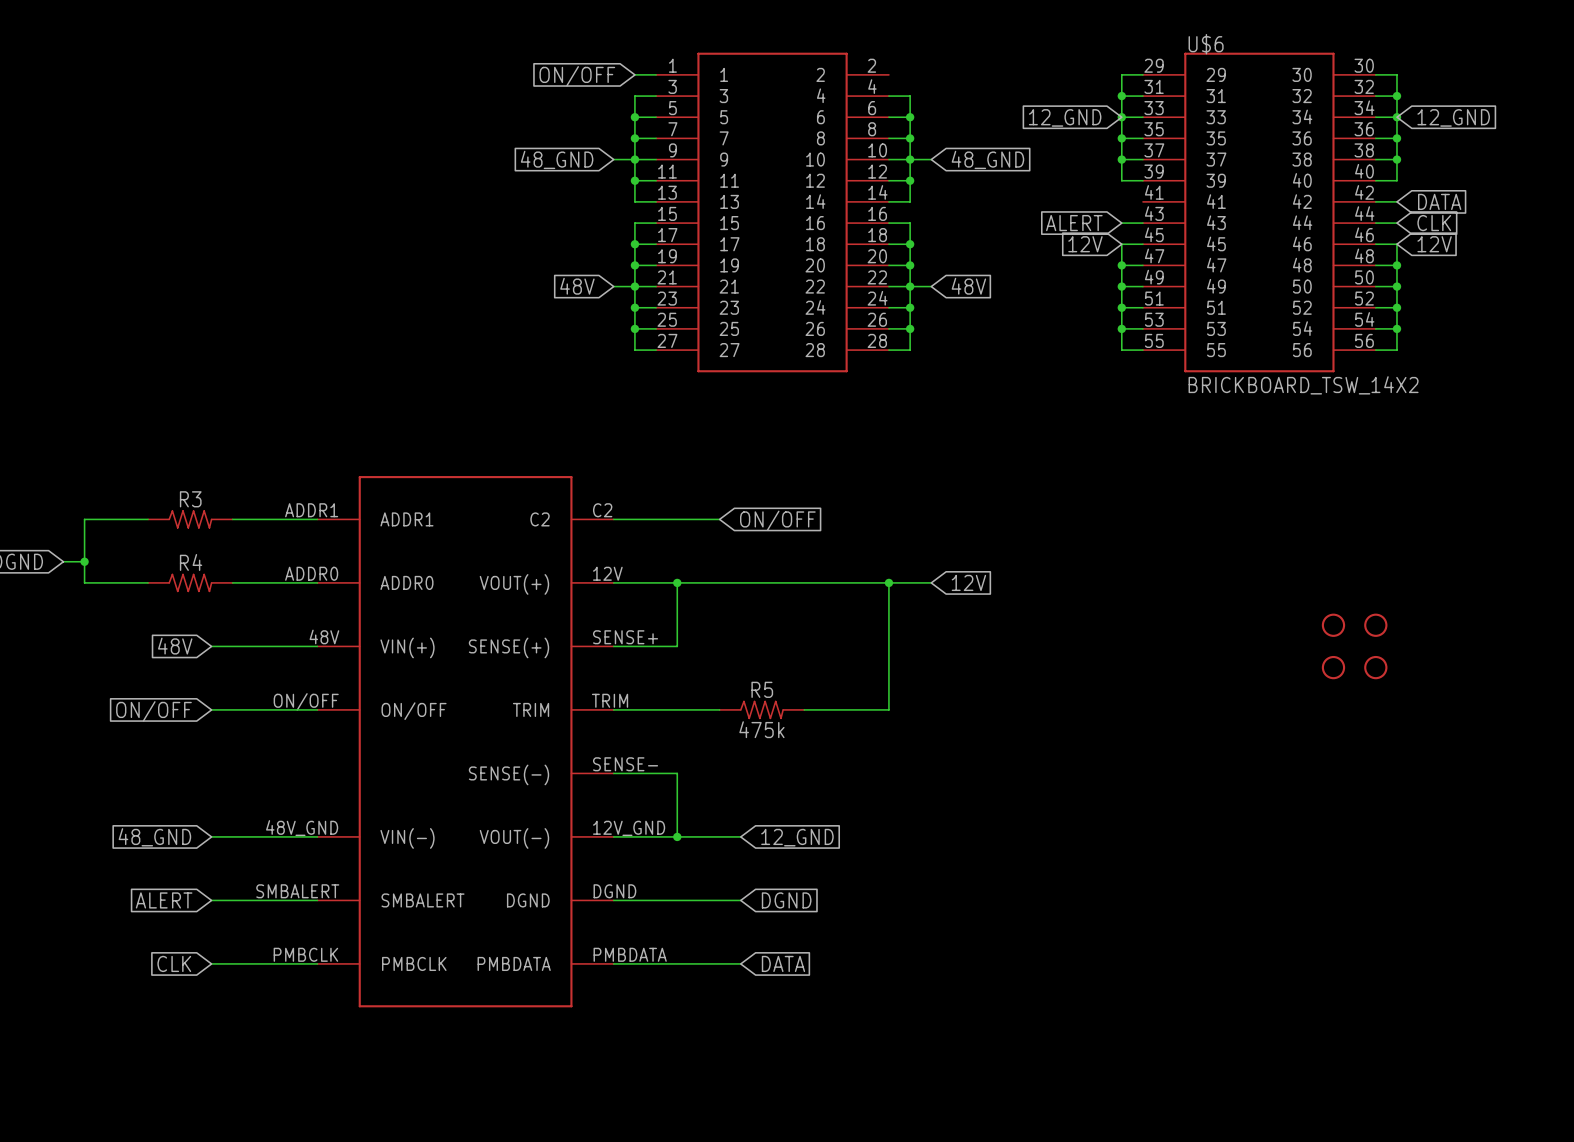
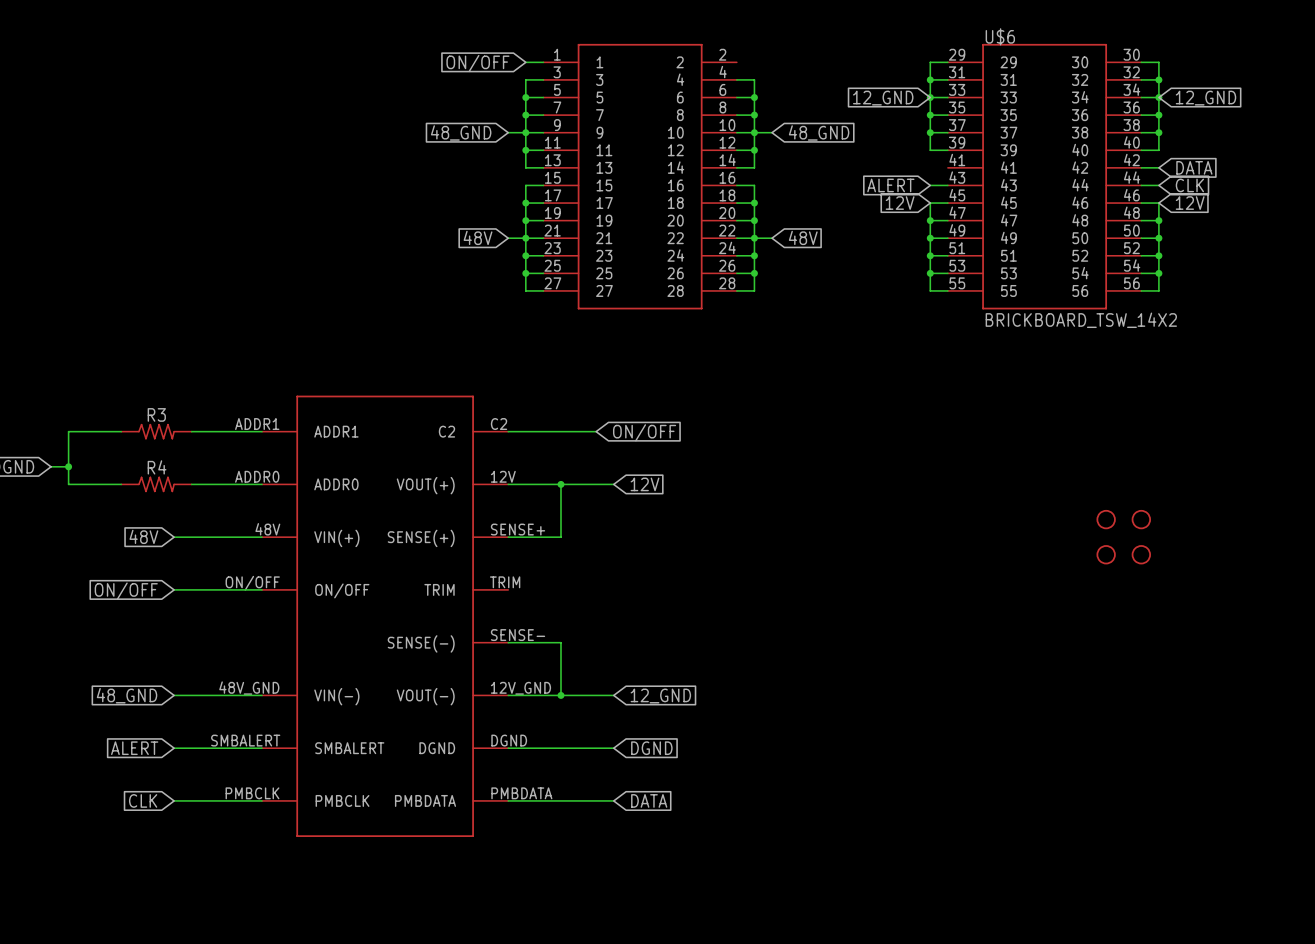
wire: (740, 582) (931, 582) -> none
wire: (888, 582) (888, 709) (804, 709) -> none
junction: (888, 582) -> none
global label position: 12V (968, 582) -> 12V (645, 484)
wire: (613, 709) (719, 709) -> none
R5: 475k (761, 709) -> none

